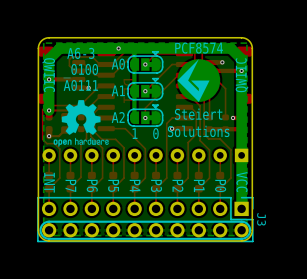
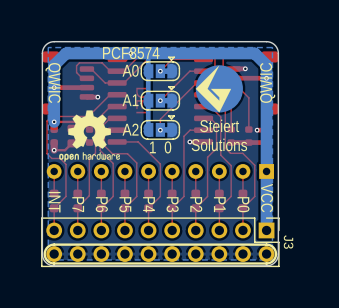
text position: PCF8574 (199, 48) -> PCF8574 (131, 53)
text: A6-3 (80, 53) -> none
text: _0100 (80, 71) -> none
text: A0111 (80, 85) -> none

